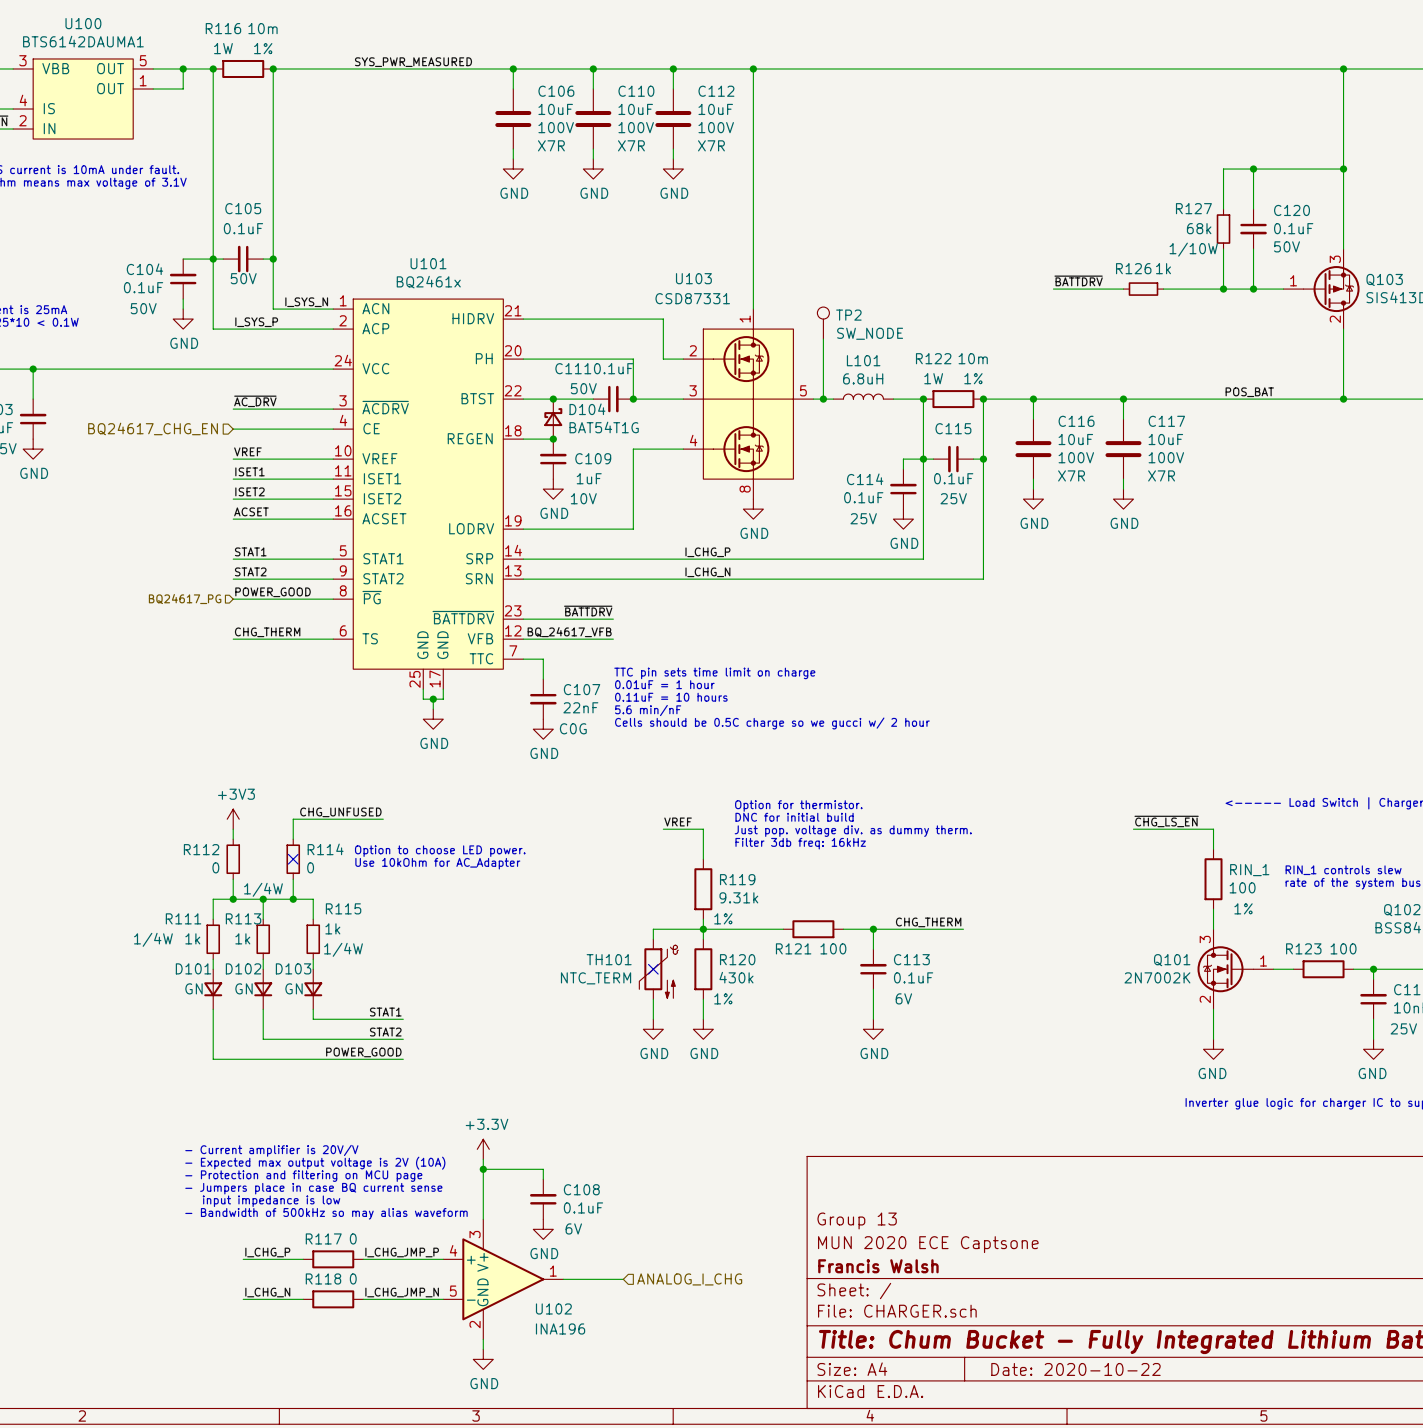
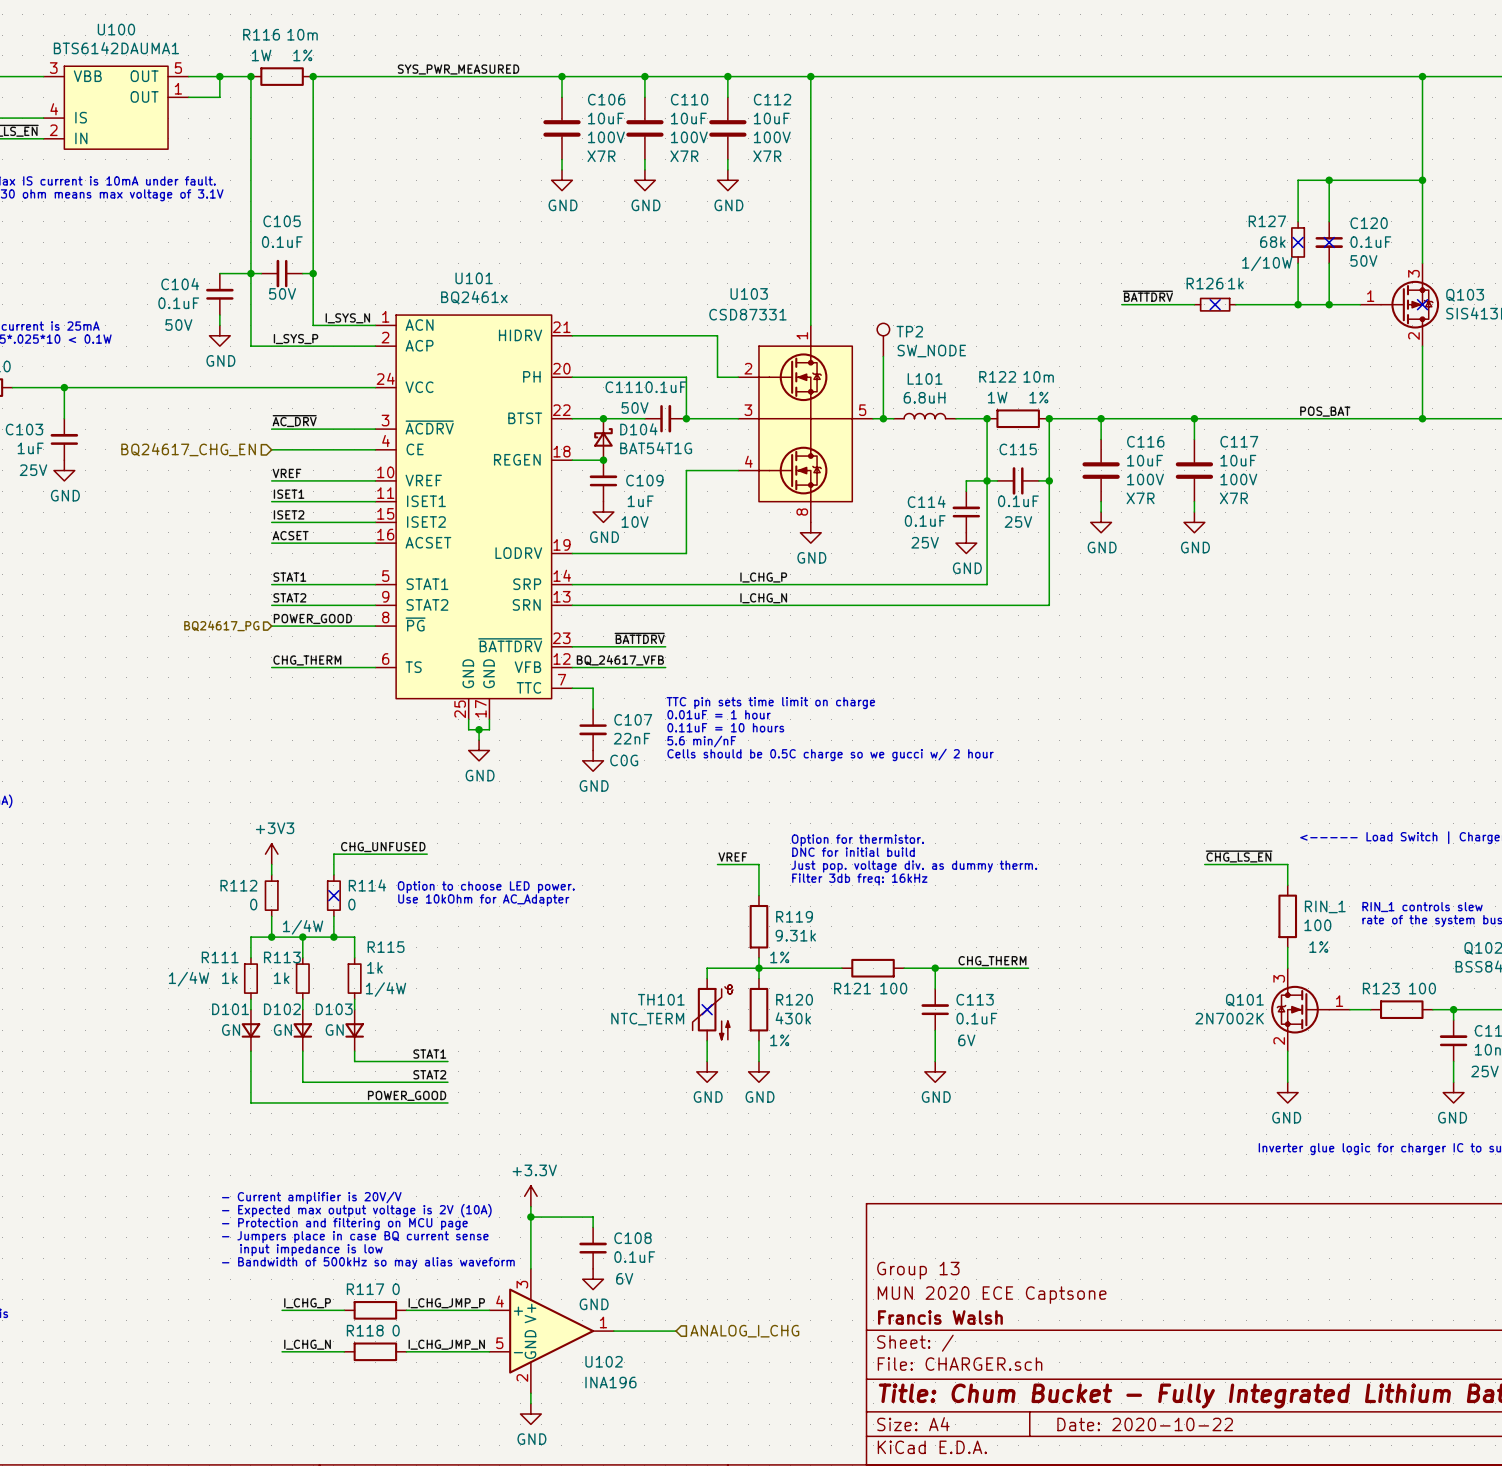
no-connect mark: none -> (1298, 242)
no-connect mark: none -> (1329, 242)
no-connect mark: none -> (1215, 304)
no-connect mark: none -> (1422, 304)

